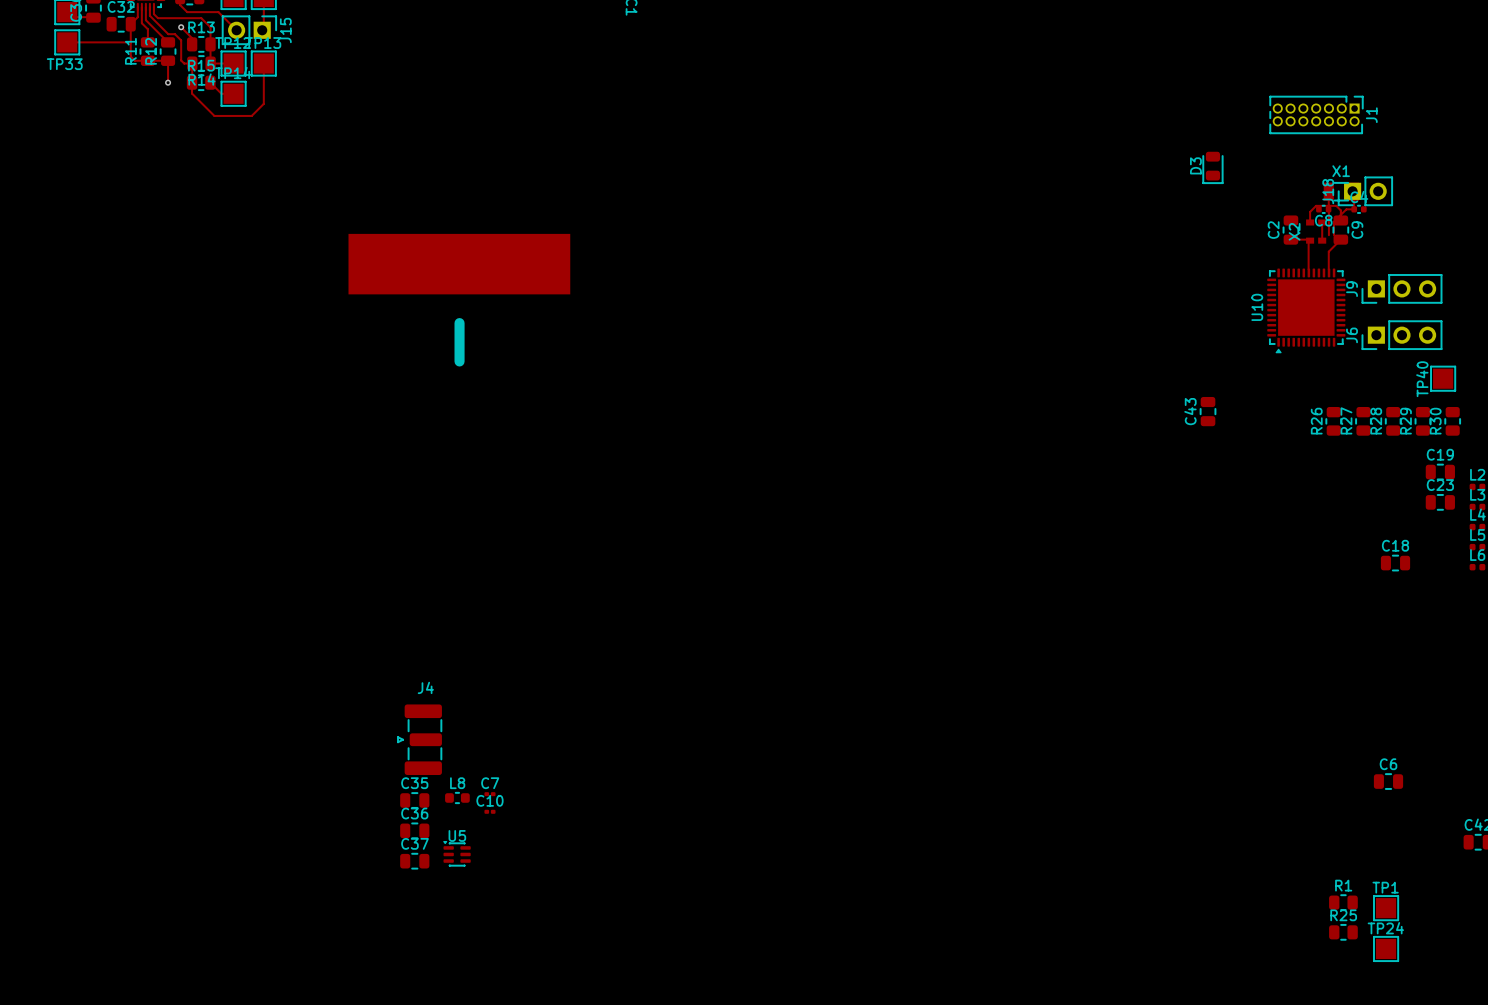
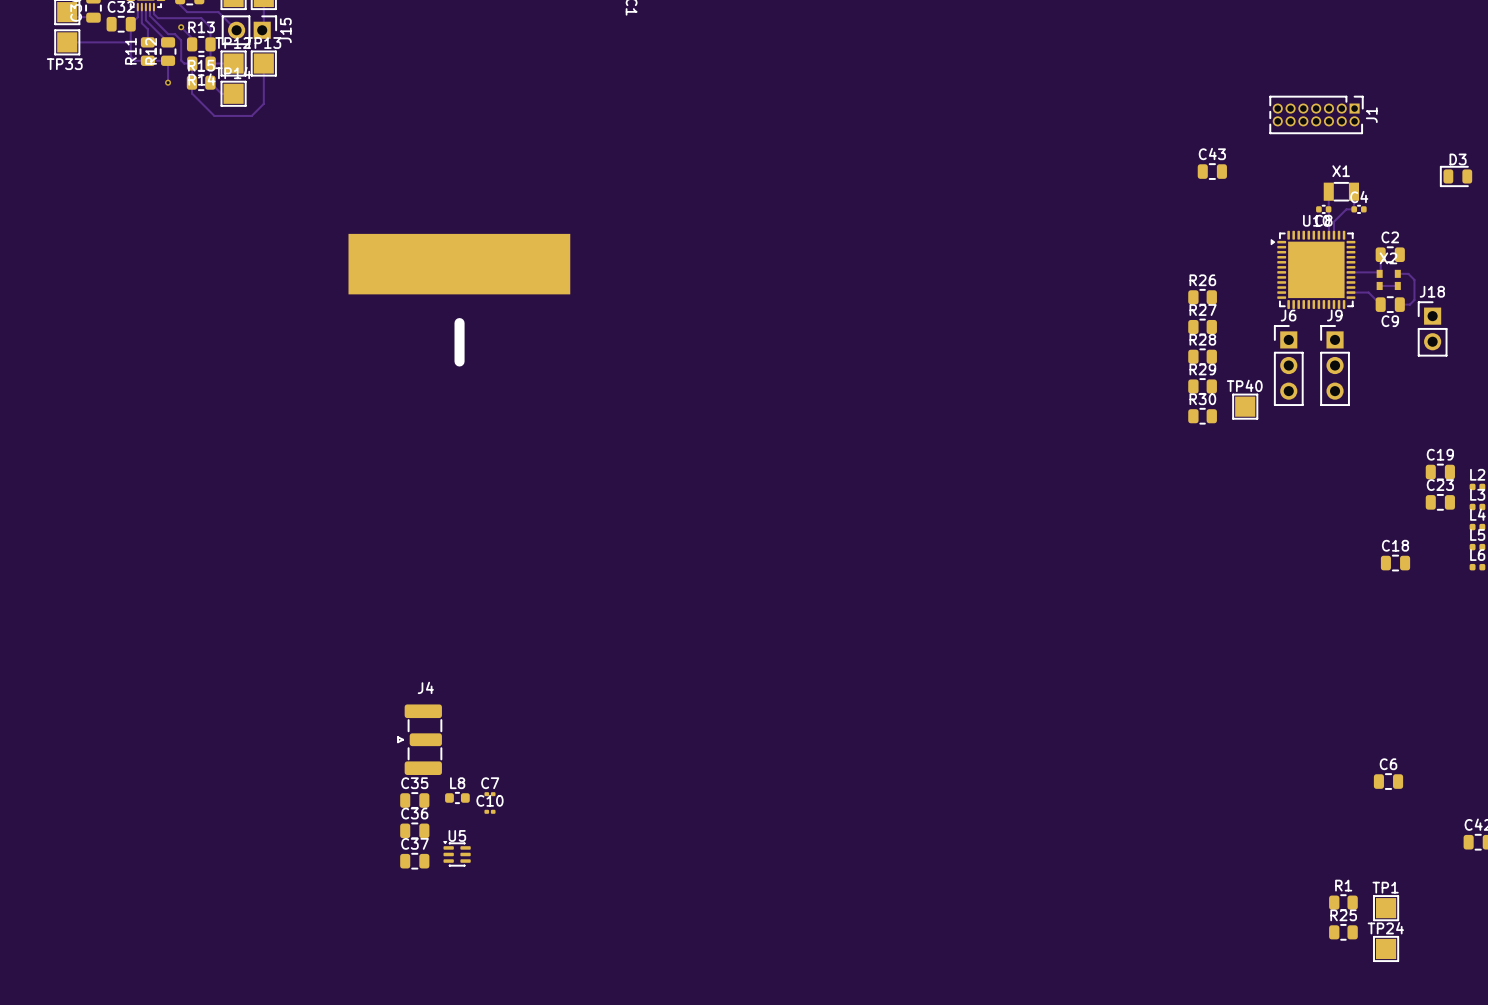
D3 rotation: 0° (1212, 167) -> 90° clockwise (1456, 176)
D3 position: (1212, 167) -> (1456, 176)
J18 rotation: 0° (1365, 191) -> 90° clockwise (1432, 328)
J18 position: (1365, 191) -> (1432, 328)
track: (1340, 220) (1340, 210) (1336, 205) (1316, 205) (1310, 211) (1310, 222) -> none
track: (1322, 222) (1322, 240) -> none
C2 rotation: 0° (1290, 230) -> 90° clockwise (1390, 254)
C2 position: (1290, 230) -> (1390, 254)
C9 rotation: 0° (1340, 230) -> 90° clockwise (1390, 304)
C9 position: (1340, 230) -> (1390, 304)
X2 rotation: 0° (1316, 231) -> 90° clockwise (1388, 279)
X2 position: (1316, 231) -> (1388, 279)
track: (1290, 239) (1310, 240) (1308, 269) -> none
track: (1340, 239) (1328, 251) (1328, 269) -> none
track: none -> (1380, 254) (1379, 273) (1350, 272)
track: none -> (1397, 273) (1408, 273) (1414, 279) (1414, 300) (1409, 304) (1399, 304)
track: none -> (1379, 285) (1397, 285)
J9 rotation: 0° (1401, 288) -> 90° clockwise (1335, 365)
J9 position: (1401, 288) -> (1335, 365)
track: none -> (1350, 292) (1368, 292) (1380, 304)
U10 rotation: 0° (1306, 310) -> 90° clockwise (1313, 269)
J6 rotation: 0° (1401, 335) -> 90° clockwise (1288, 365)
J6 position: (1401, 335) -> (1288, 365)
TP40 position: (1443, 378) -> (1245, 406)
TP40 name rotation: 0° (1422, 379) -> 90° clockwise (1244, 385)
C43 rotation: 0° (1208, 411) -> 90° clockwise (1212, 171)
C43 position: (1208, 411) -> (1212, 171)
R26 rotation: 0° (1333, 421) -> 90° clockwise (1202, 297)
R26 position: (1333, 421) -> (1202, 297)
R27 rotation: 0° (1363, 421) -> 90° clockwise (1202, 327)
R27 position: (1363, 421) -> (1202, 327)
R28 rotation: 0° (1393, 421) -> 90° clockwise (1202, 356)
R28 position: (1393, 421) -> (1202, 356)
R29 rotation: 0° (1422, 421) -> 90° clockwise (1202, 386)
R29 position: (1422, 421) -> (1202, 386)
R30 rotation: 0° (1452, 421) -> 90° clockwise (1202, 416)
R30 position: (1452, 421) -> (1202, 416)

